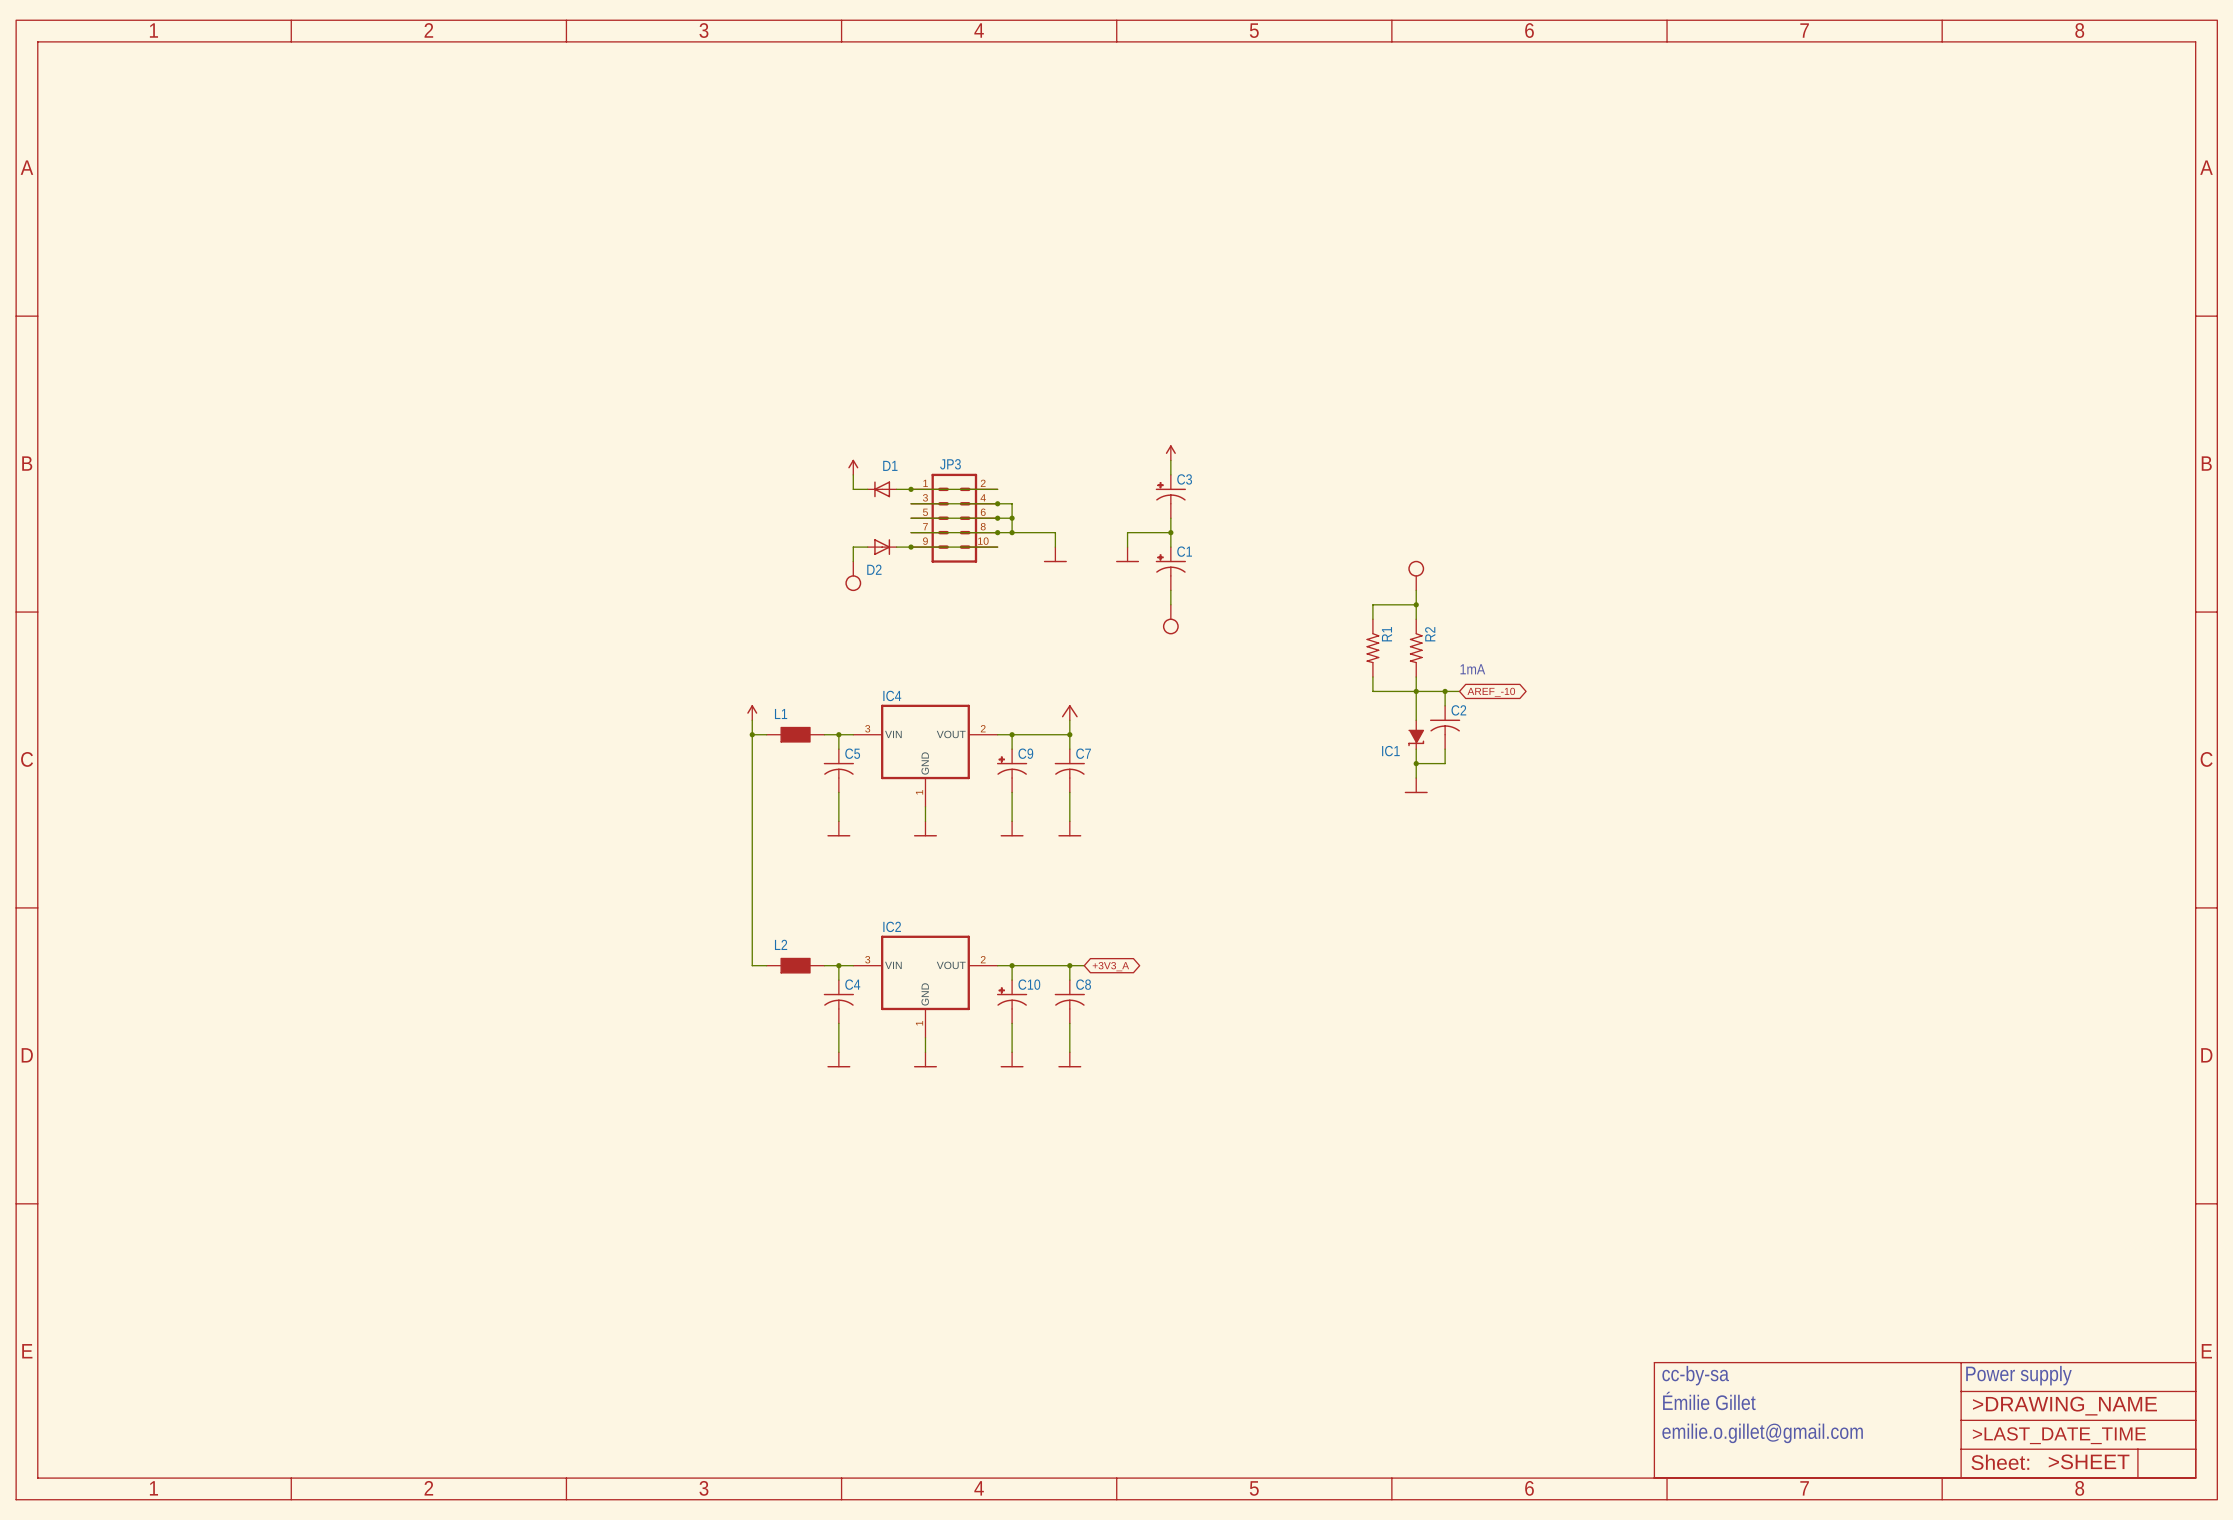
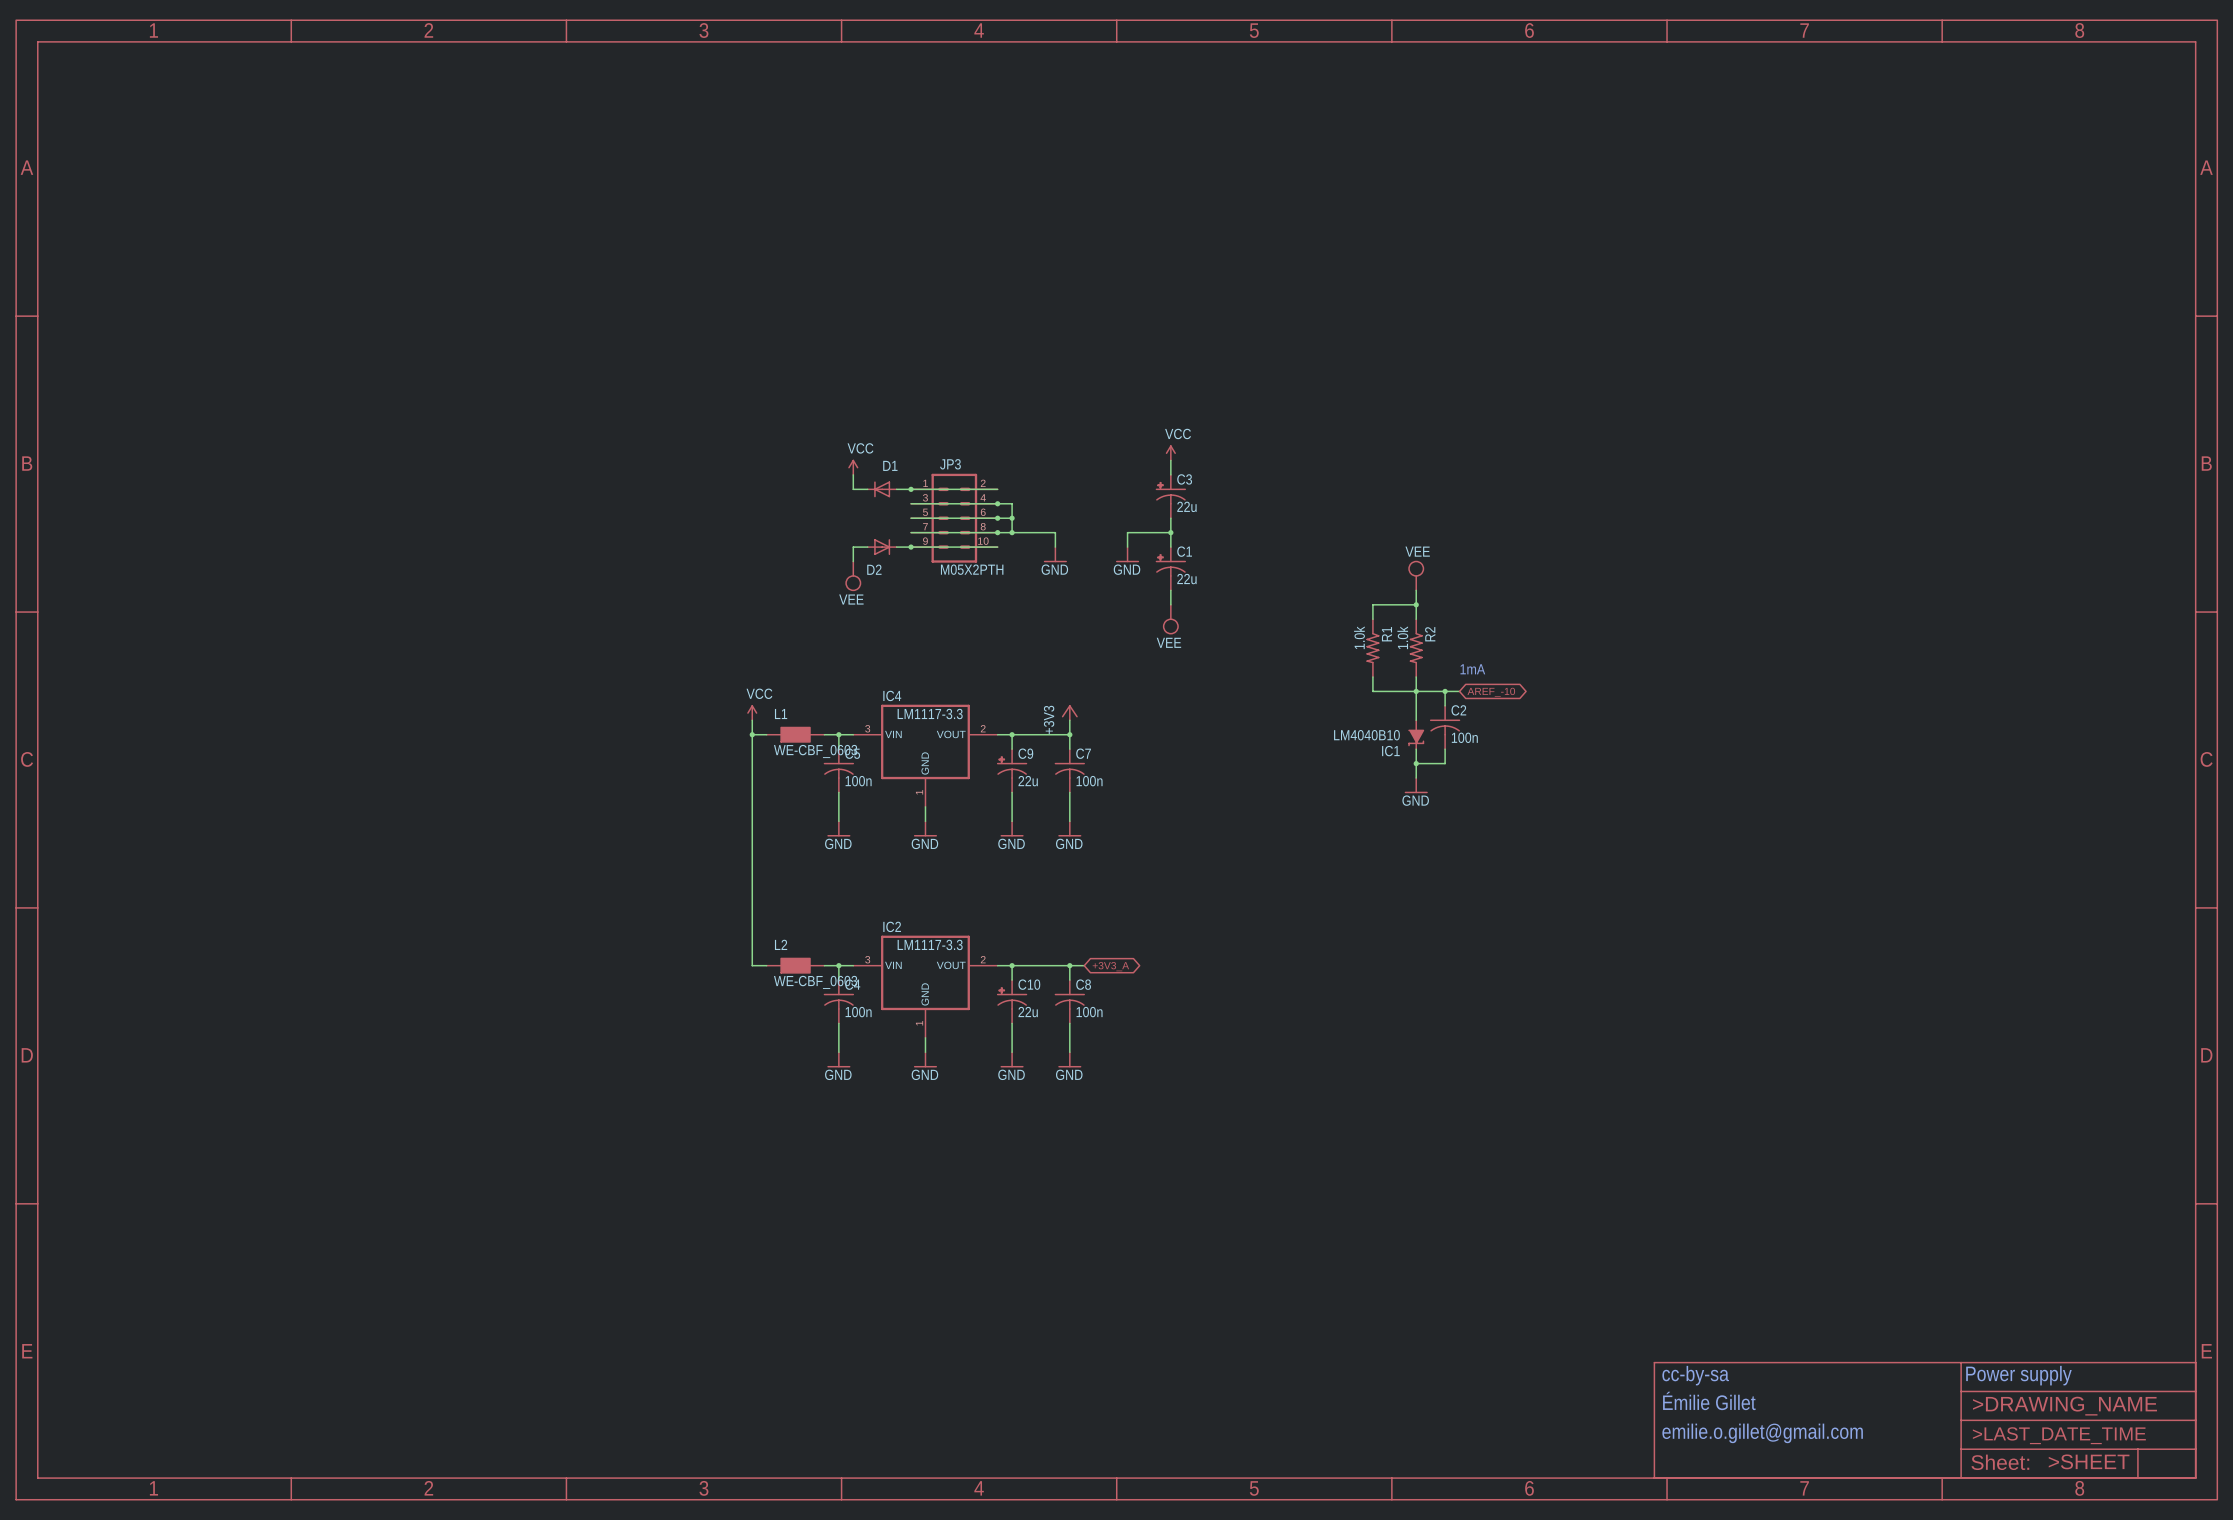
power symbol text: none -> VCC (1178, 433)
power symbol text: none -> VCC (860, 448)
C3 value: none -> 22u (1186, 506)
power symbol text: none -> VEE (1417, 551)
JP3 value: none -> M05X2PTH (972, 569)
power symbol text: none -> GND (1054, 569)
power symbol text: none -> GND (1127, 569)
C1 value: none -> 22u (1186, 579)
power symbol text: none -> VEE (851, 599)
R1 value: none -> 1.0k (1359, 637)
R2 value: none -> 1.0k (1402, 637)
power symbol text: none -> VEE (1168, 642)
power symbol text: none -> VCC (759, 693)
IC4 value: none -> LM1117-3.3 (930, 714)
power symbol text: none -> +3V3 (1049, 719)
IC1 value: none -> LM4040B10 (1366, 735)
C2 value: none -> 100n (1464, 737)
L1 value: none -> WE-CBF_0603 (815, 751)
C5 value: none -> 100n (858, 781)
C9 value: none -> 22u (1028, 781)
C7 value: none -> 100n (1089, 781)
power symbol text: none -> GND (1415, 800)
power symbol text: none -> GND (838, 843)
power symbol text: none -> GND (924, 843)
power symbol text: none -> GND (1011, 843)
power symbol text: none -> GND (1069, 843)
IC2 value: none -> LM1117-3.3 (930, 944)
L2 value: none -> WE-CBF_0603 (815, 982)
C4 value: none -> 100n (858, 1012)
C10 value: none -> 22u (1028, 1012)
C8 value: none -> 100n (1089, 1012)
power symbol text: none -> GND (838, 1074)
power symbol text: none -> GND (924, 1074)
power symbol text: none -> GND (1011, 1074)
power symbol text: none -> GND (1069, 1074)

